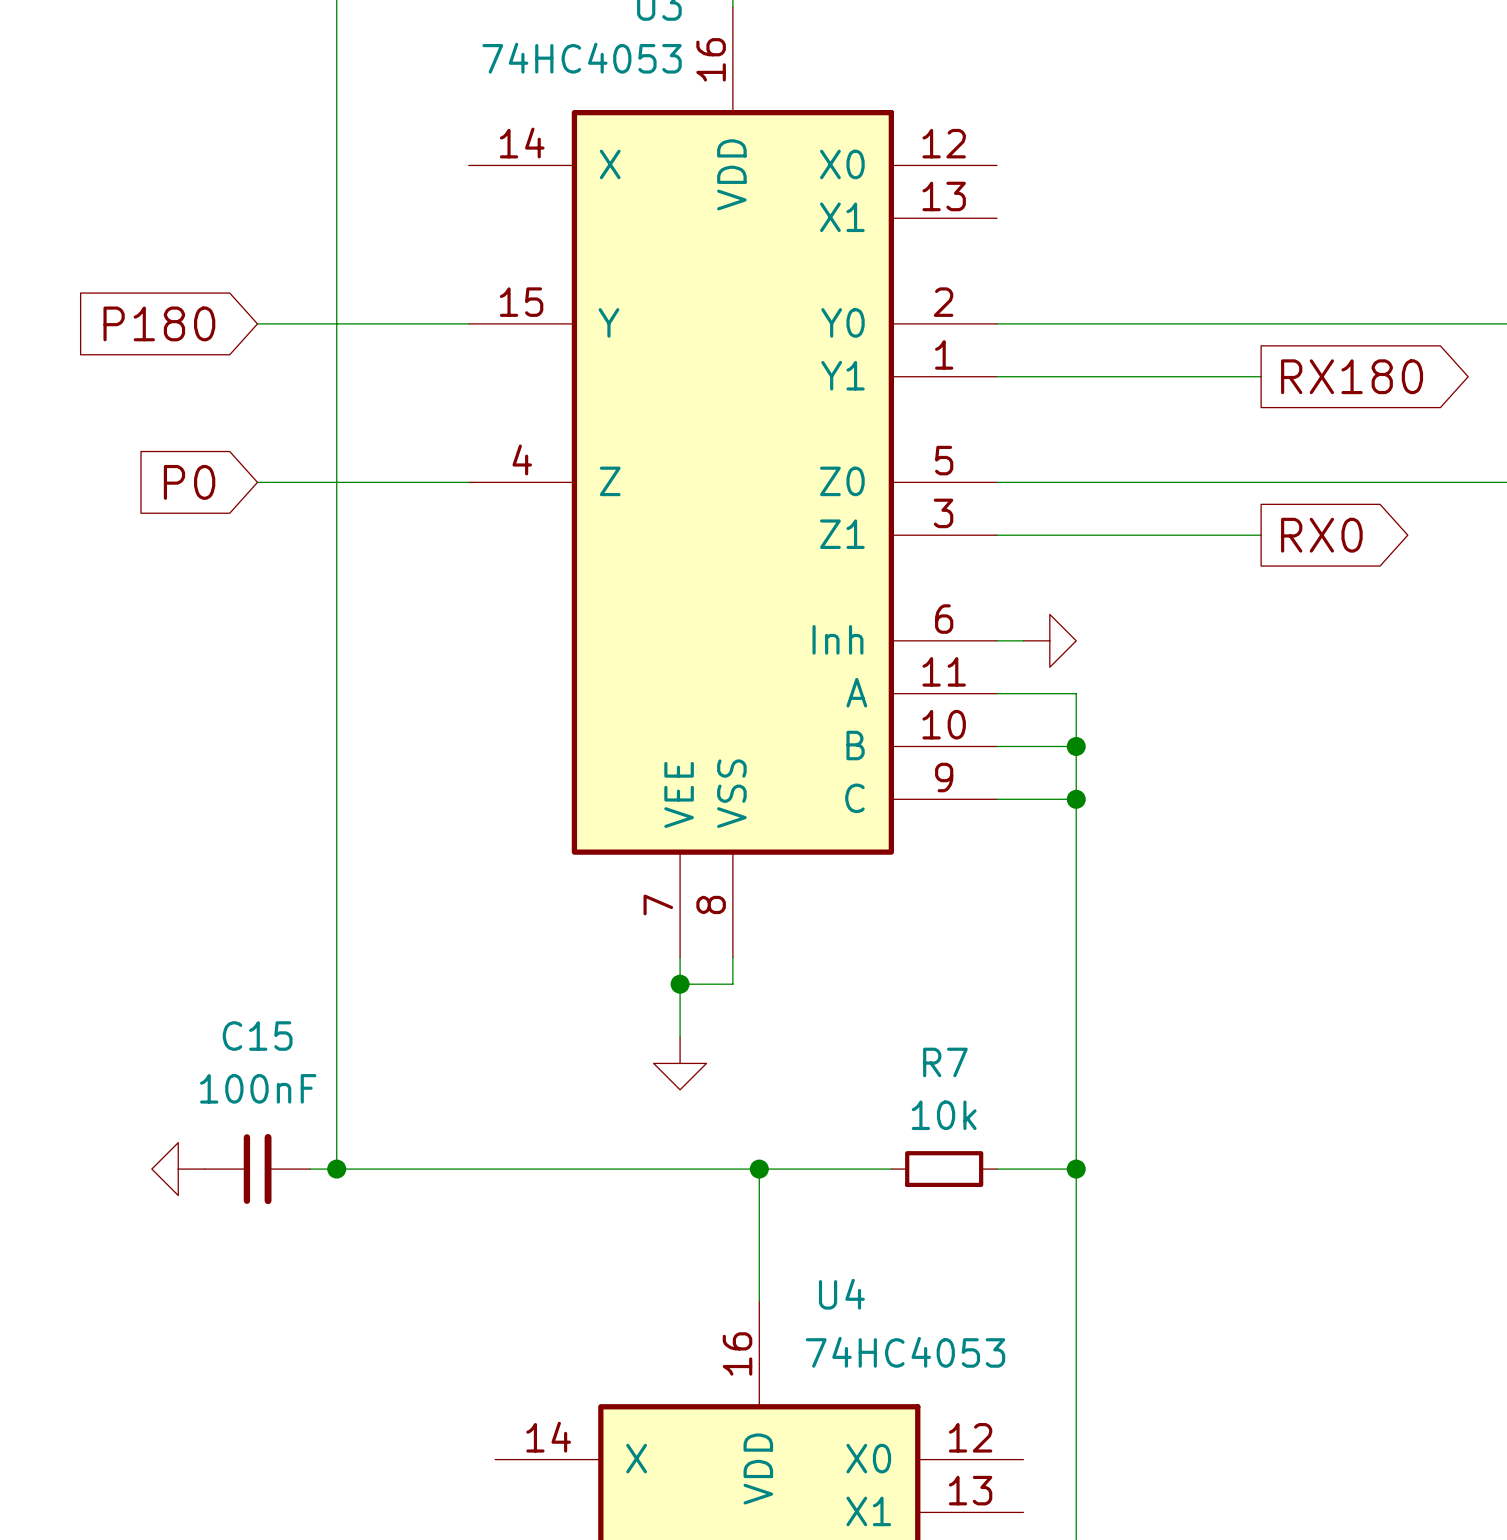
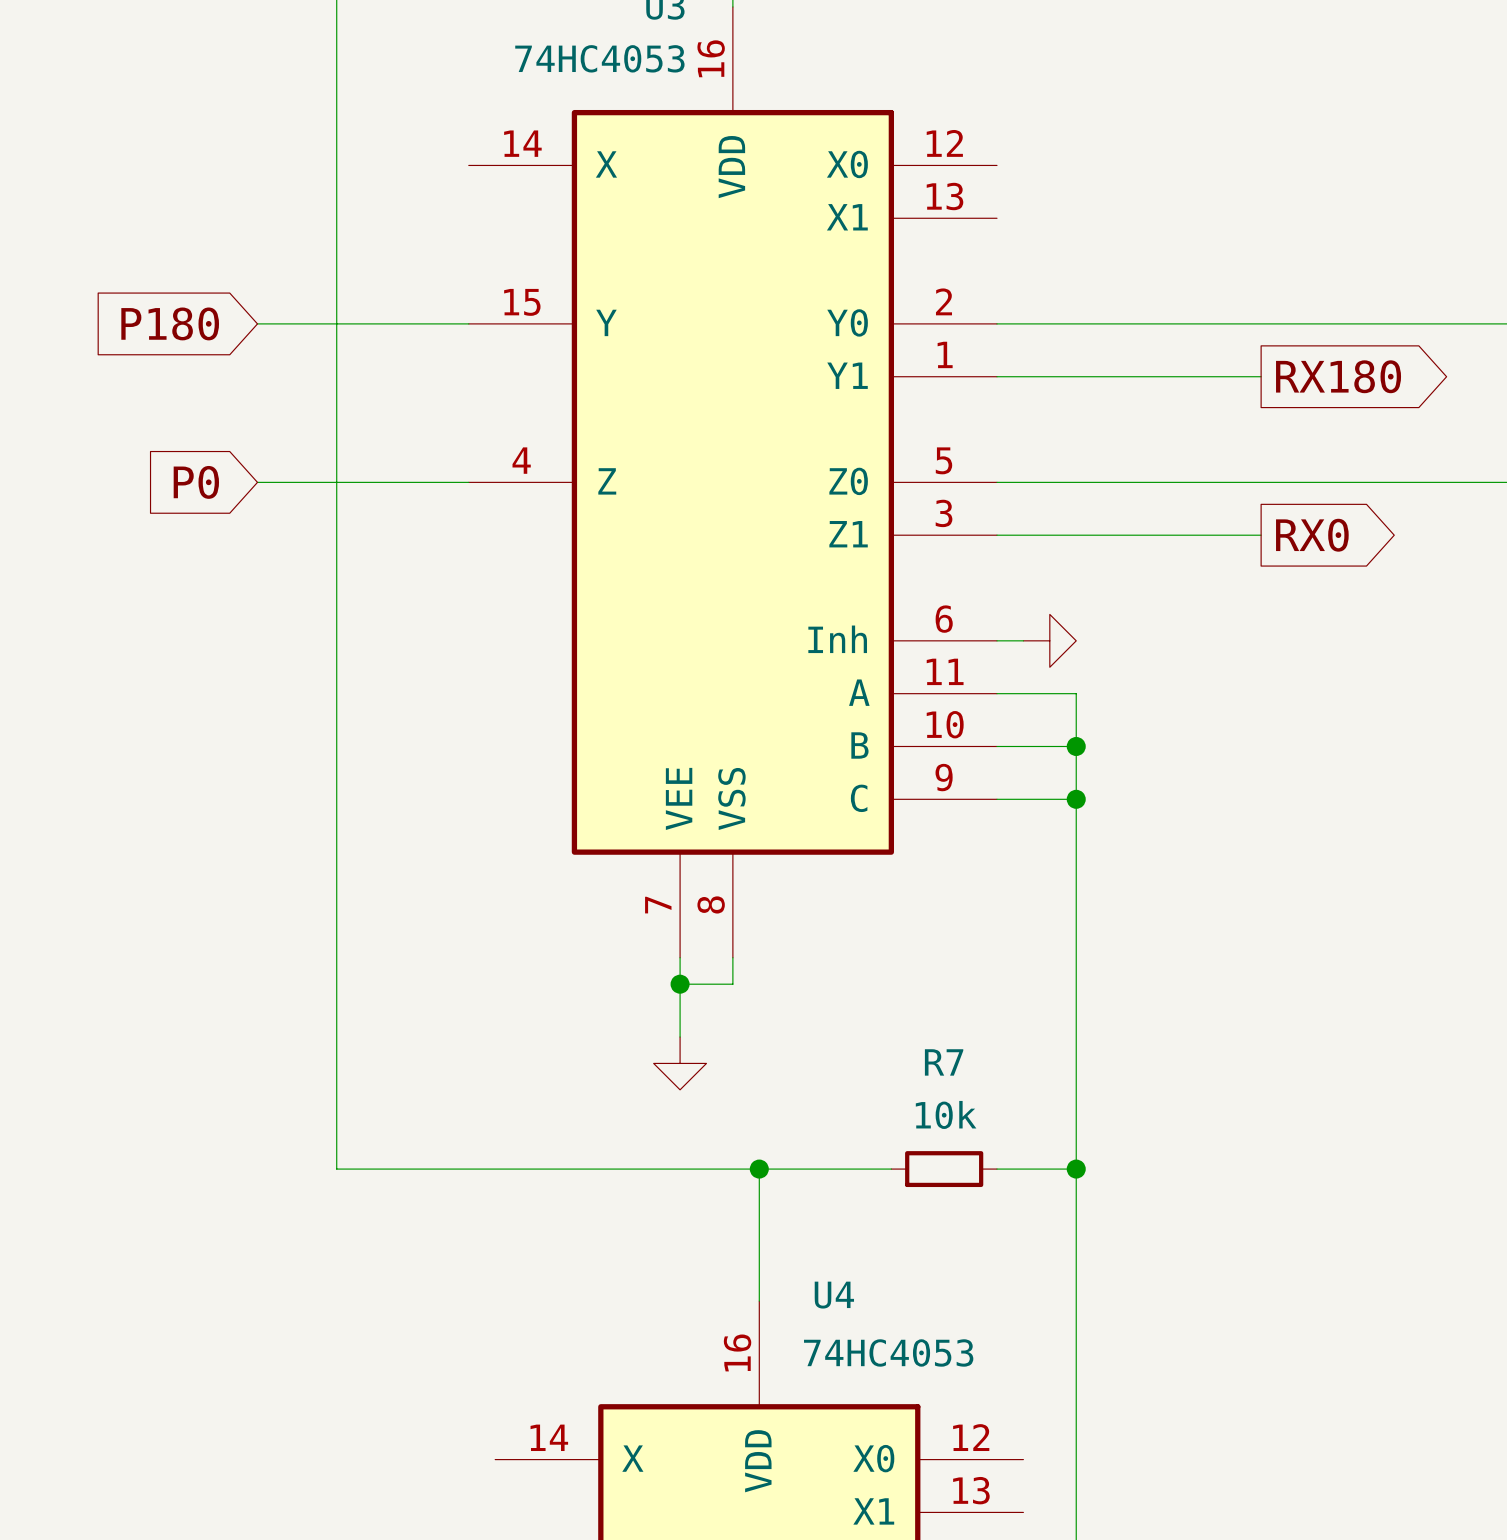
power symbol: (178, 1169) -> none
C15: 100nF (257, 1169) -> none
wire: (310, 1169) (336, 1169) -> none
junction: (336, 1169) -> none

